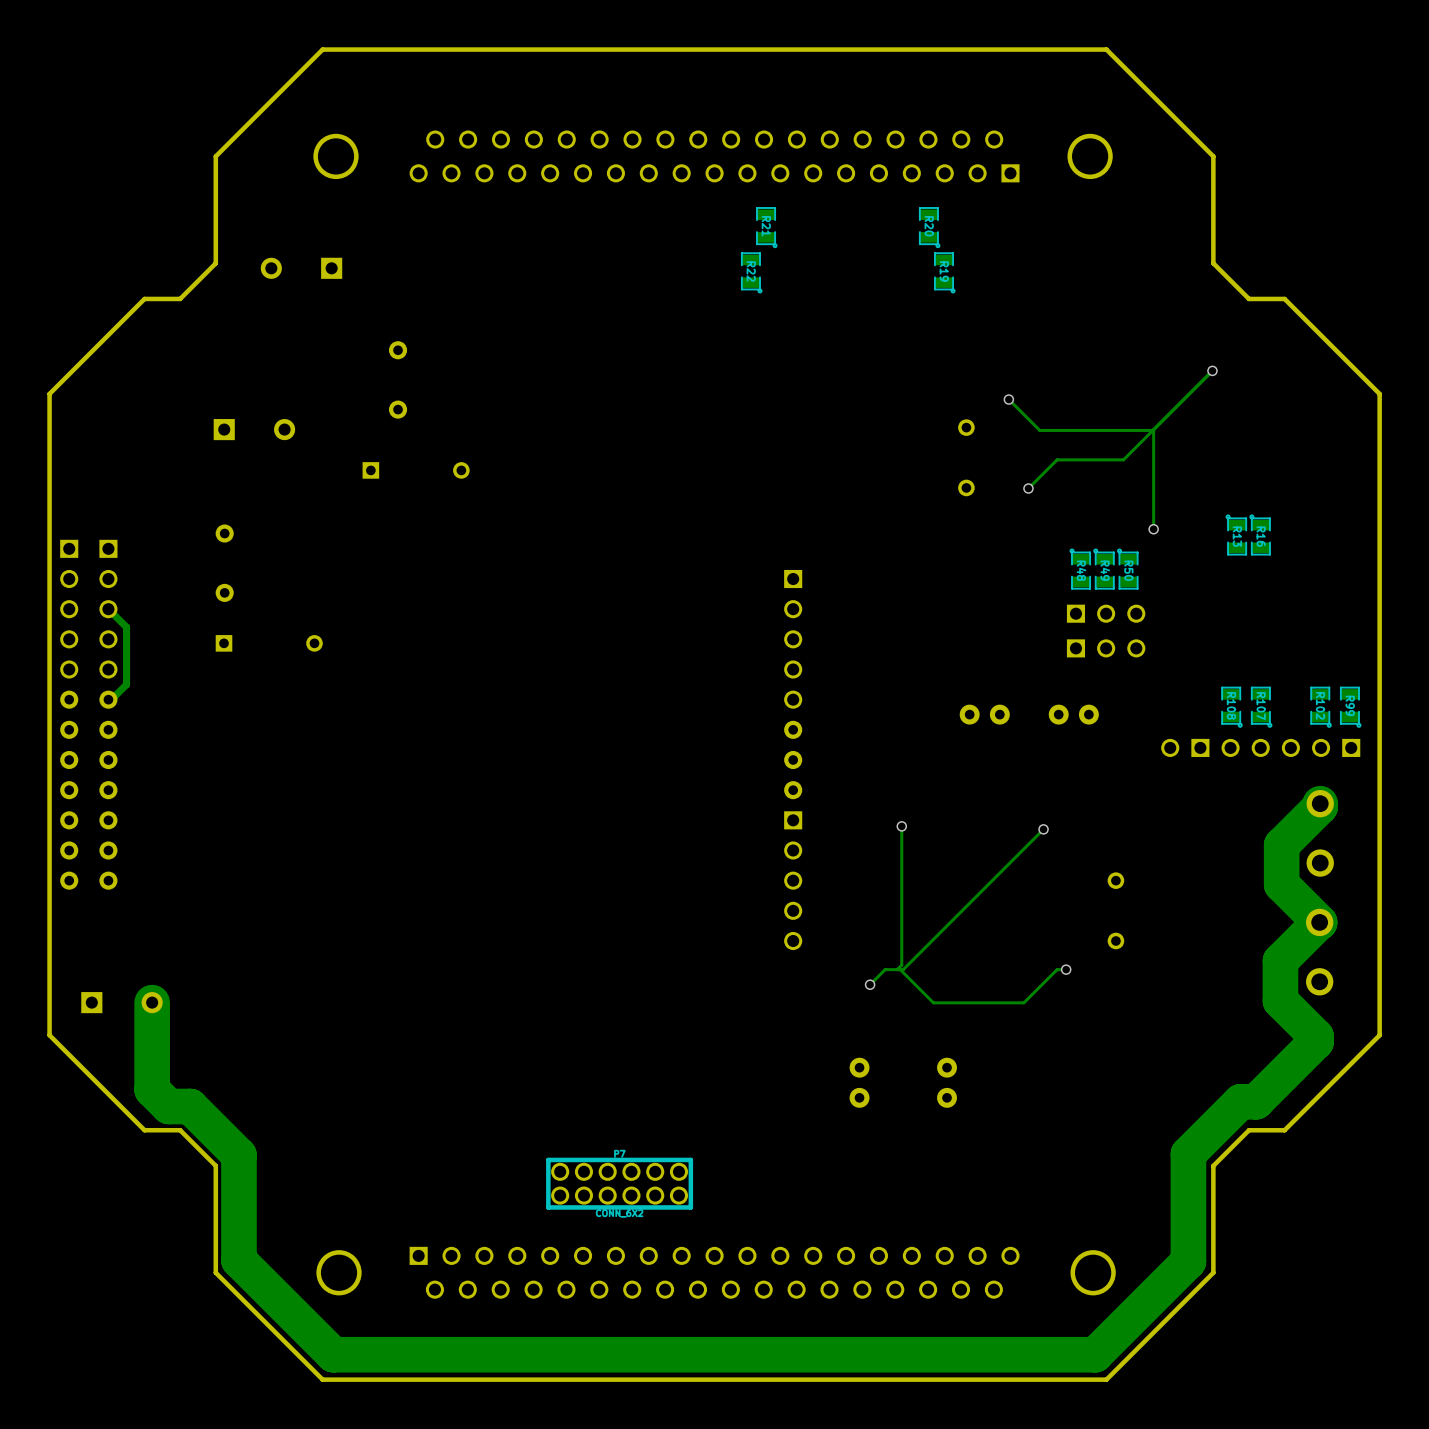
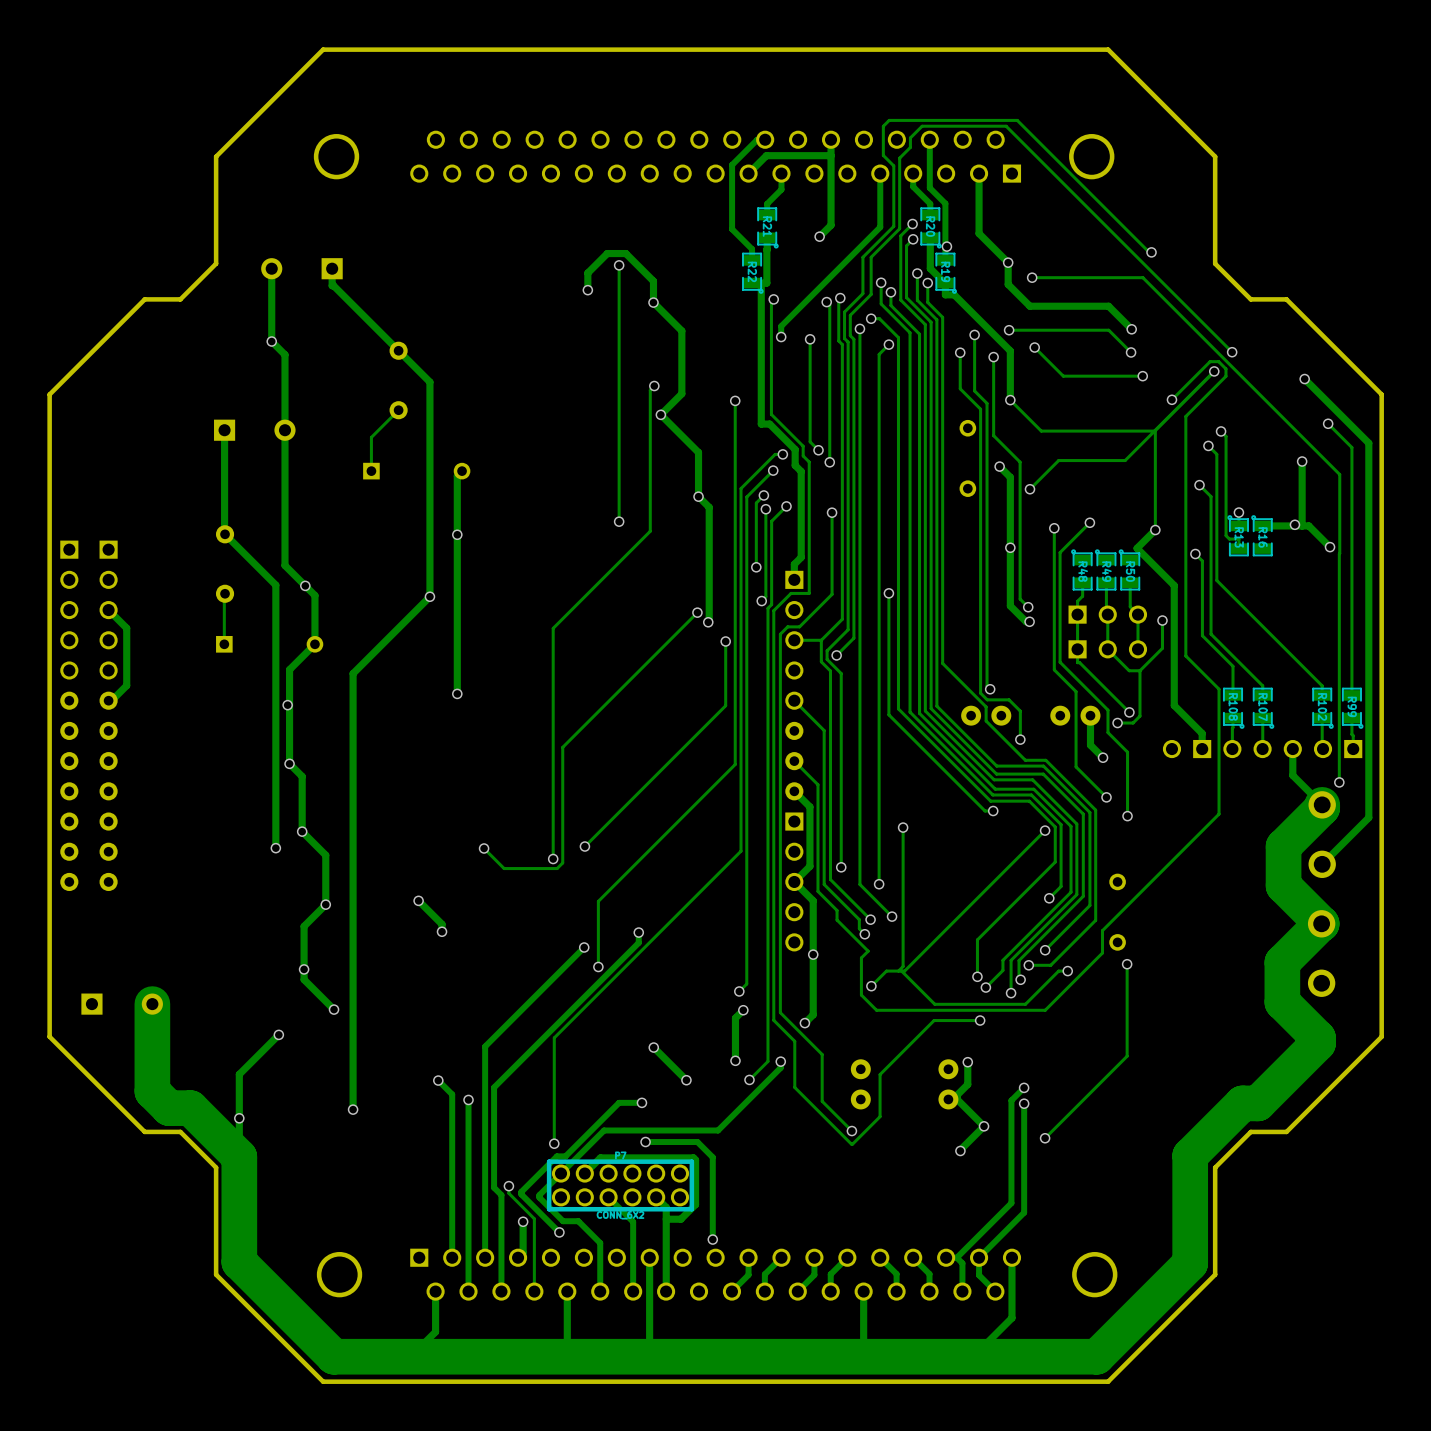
track: none -> (765, 139) (757, 139) (732, 164) (732, 229) (752, 249) (752, 260)
track: none -> (831, 139) (831, 225) (819, 236)
track: none -> (929, 139) (929, 187) (945, 203) (945, 260)
track: none -> (831, 155) (766, 155) (748, 173)
track: none -> (781, 173) (781, 189) (767, 203) (767, 215)
track: none -> (880, 173) (880, 227) (781, 326) (781, 337)
track: none -> (913, 173) (913, 186) (930, 203) (930, 215)
track: none -> (979, 173) (979, 233) (1008, 262) (1008, 284) (1029, 306) (1108, 306) (1131, 329)
track: none -> (912, 224) (900, 235) (900, 300) (925, 324) (925, 711) (994, 779) (1032, 779) (1076, 824) (1076, 894) (1011, 960) (1011, 993)
via: none -> (912, 224)
via: none -> (819, 236)
track: none -> (767, 237) (766, 283) (752, 283)
track: none -> (930, 237) (930, 268) (945, 283) (945, 294) (954, 294) (1010, 350) (1010, 400)
track: none -> (913, 239) (906, 245) (906, 297) (931, 322) (931, 708) (996, 774) (1043, 774) (1083, 814) (1083, 896) (1019, 960) (1020, 979)
via: none -> (913, 239)
via: none -> (946, 246)
track: none -> (1151, 252) (1149, 252) (1017, 120) (889, 120) (883, 126) (883, 155) (893, 165) (893, 226) (862, 257) (862, 293) (844, 312) (844, 338) (848, 342) (848, 629) (827, 650) (827, 659) (841, 673) (841, 867)
via: none -> (1151, 252)
via: none -> (1008, 262)
track: none -> (619, 265) (619, 521)
via: none -> (619, 265)
track: none -> (271, 268) (271, 341) (284, 354) (284, 565) (314, 595) (314, 644) (289, 669) (289, 763) (302, 776) (302, 831) (325, 855) (325, 904) (304, 926) (304, 979) (334, 1009)
track: none -> (332, 268) (332, 285) (429, 382) (429, 596) (353, 673) (353, 1109)
track: none -> (917, 273) (917, 300) (936, 319) (936, 706) (996, 766) (1043, 766) (1089, 812) (1089, 905) (1045, 950)
via: none -> (917, 273)
track: none -> (1032, 277) (1142, 277) (1339, 474) (1339, 782)
via: none -> (1032, 277)
track: none -> (759, 283) (761, 284) (761, 424) (769, 424) (795, 449) (795, 465) (801, 471) (801, 557) (794, 564) (794, 579)
track: none -> (881, 282) (881, 303) (910, 332) (910, 712) (992, 794) (1031, 794) (1061, 824) (1061, 886) (1049, 898)
via: none -> (881, 282)
track: none -> (927, 283) (927, 302) (942, 317) (942, 663) (986, 706) (986, 721) (1025, 760) (1045, 760) (1095, 810) (1095, 920) (1050, 965) (1028, 965)
via: none -> (927, 283)
track: none -> (587, 290) (587, 273) (607, 253) (625, 253) (653, 281) (653, 302) (681, 330) (681, 393) (660, 414) (698, 452) (698, 496) (709, 507) (708, 622)
via: none -> (587, 290)
track: none -> (890, 292) (890, 305) (919, 334) (919, 713) (995, 789) (1033, 789) (1071, 826) (1071, 892) (1002, 960) (1002, 970) (985, 987)
via: none -> (890, 292)
track: none -> (840, 298) (838, 340) (842, 344) (842, 619) (821, 640)
via: none -> (840, 298)
track: none -> (773, 299) (771, 301) (771, 414) (803, 446) (803, 455) (809, 462) (809, 593) (791, 593) (773, 610) (773, 1020) (794, 1041) (794, 1087) (851, 1144) (880, 1116) (880, 1074) (934, 1020) (980, 1020)
via: none -> (773, 299)
track: none -> (826, 302) (829, 305) (829, 462)
via: none -> (826, 302)
via: none -> (653, 302)
track: none -> (871, 318) (879, 318) (898, 337) (898, 708) (990, 801) (1029, 801) (1055, 827) (1055, 862) (977, 939) (977, 976)
via: none -> (871, 318)
track: none -> (859, 328) (859, 884) (892, 916)
via: none -> (859, 328)
via: none -> (1131, 329)
track: none -> (1009, 330) (1108, 330) (1131, 352)
via: none -> (1009, 330)
track: none -> (974, 334) (974, 391) (987, 403) (987, 686) (990, 689)
via: none -> (974, 334)
via: none -> (781, 337)
track: none -> (810, 339) (810, 441) (818, 450)
via: none -> (810, 339)
via: none -> (271, 341)
track: none -> (888, 344) (879, 354) (879, 884)
via: none -> (888, 344)
track: none -> (1034, 347) (1063, 376) (1142, 376)
via: none -> (1034, 347)
via: none -> (1131, 352)
track: none -> (1232, 352) (1006, 126) (922, 126) (910, 137) (910, 147) (899, 158) (899, 228) (871, 257) (871, 294) (850, 315) (850, 335) (853, 339) (853, 638) (836, 655)
via: none -> (1232, 352)
track: none -> (960, 352) (960, 388) (980, 409) (980, 693) (987, 699) (1009, 699) (1020, 711) (1020, 739)
via: none -> (960, 352)
track: none -> (993, 357) (993, 435) (1020, 462) (1020, 599) (1028, 607)
via: none -> (993, 357)
via: none -> (1142, 376)
track: none -> (1304, 379) (1368, 443) (1368, 817) (1322, 864)
via: none -> (1304, 379)
track: none -> (654, 386) (650, 390) (650, 531) (553, 628) (553, 859)
via: none -> (654, 386)
track: none -> (1171, 399) (1210, 361) (1218, 361) (1225, 368) (1225, 376) (1185, 416) (1185, 655) (1219, 689) (1219, 814) (1102, 930) (1102, 953) (1045, 1010) (876, 1010) (861, 995) (861, 957) (868, 951) (837, 920) (837, 910) (817, 891) (817, 784) (794, 761)
via: none -> (1171, 399)
track: none -> (735, 400) (735, 764) (598, 901) (598, 966)
via: none -> (735, 400)
track: none -> (398, 410) (371, 437) (371, 471)
via: none -> (660, 414)
track: none -> (1328, 423) (1351, 447) (1351, 695)
via: none -> (1328, 423)
track: none -> (224, 430) (224, 533) (275, 585) (275, 848)
track: none -> (1221, 431) (1226, 436) (1226, 535) (1229, 539) (1238, 539) (1238, 548)
via: none -> (1221, 431)
track: none -> (1208, 445) (1216, 454) (1216, 580) (1322, 685) (1322, 695)
via: none -> (1208, 445)
via: none -> (818, 450)
track: none -> (782, 454) (775, 454) (741, 488) (741, 851) (554, 1037) (554, 1143)
via: none -> (782, 454)
track: none -> (1302, 461) (1302, 525)
via: none -> (1302, 461)
via: none -> (829, 462)
track: none -> (999, 466) (1010, 477) (1010, 606) (1026, 621) (1029, 621)
via: none -> (999, 466)
track: none -> (773, 470) (746, 497) (746, 984) (739, 991)
via: none -> (773, 470)
track: none -> (462, 471) (457, 475) (457, 693)
track: none -> (1199, 485) (1211, 496) (1211, 634) (1262, 685) (1262, 695)
via: none -> (1199, 485)
track: none -> (763, 495) (756, 503) (756, 567)
via: none -> (763, 495)
via: none -> (698, 496)
track: none -> (786, 506) (771, 521) (771, 604) (767, 608) (767, 1061) (749, 1079)
via: none -> (786, 506)
track: none -> (765, 509) (765, 596) (761, 601)
via: none -> (765, 509)
track: none -> (832, 512) (832, 594) (799, 626) (787, 626) (780, 634) (780, 1012) (822, 1054) (822, 1101) (851, 1131)
via: none -> (832, 512)
via: none -> (1238, 512)
via: none -> (619, 521)
track: none -> (1089, 522) (1060, 552) (1060, 662) (1107, 710) (1107, 732) (1127, 752) (1127, 816)
via: none -> (1089, 522)
via: none -> (1294, 524)
track: none -> (1262, 525) (1308, 525) (1330, 547)
track: none -> (1054, 528) (1054, 669) (1076, 691) (1076, 766) (1106, 797)
via: none -> (1054, 528)
track: none -> (1155, 530) (1137, 548) (1174, 585) (1174, 705) (1202, 733) (1202, 749)
via: none -> (457, 534)
via: none -> (1010, 547)
via: none -> (1330, 547)
track: none -> (1195, 554) (1202, 561) (1202, 635) (1232, 666) (1232, 695)
via: none -> (1195, 554)
via: none -> (756, 567)
track: none -> (1082, 582) (1082, 596) (1077, 601) (1077, 662) (1129, 712)
track: none -> (1106, 582) (1107, 649) (1129, 670) (1139, 670)
track: none -> (1130, 582) (1130, 606) (1137, 614) (1137, 649)
via: none -> (305, 585)
track: none -> (225, 593) (224, 644)
track: none -> (888, 593) (888, 714) (985, 811) (993, 811)
via: none -> (888, 593)
via: none -> (429, 596)
via: none -> (761, 601)
via: none -> (1028, 607)
track: none -> (697, 612) (562, 747) (562, 862) (557, 868) (504, 868) (484, 848)
via: none -> (697, 612)
track: none -> (1162, 620) (1162, 648) (1139, 670)
via: none -> (1162, 620)
via: none -> (1029, 621)
via: none -> (708, 622)
track: none -> (821, 640) (821, 661) (830, 670) (830, 879) (870, 919)
track: none -> (821, 640) (794, 640)
track: none -> (725, 641) (725, 705) (584, 846)
via: none -> (725, 641)
via: none -> (836, 655)
track: none -> (1139, 670) (1139, 716) (1133, 723) (1117, 723)
via: none -> (990, 689)
via: none -> (457, 693)
track: none -> (794, 700) (824, 730) (824, 884) (859, 919) (859, 928) (864, 934)
via: none -> (287, 705)
via: none -> (1129, 712)
track: none -> (1090, 715) (1090, 745) (1103, 757)
track: none -> (1232, 718) (1232, 749)
track: none -> (1262, 718) (1262, 748)
track: none -> (1322, 718) (1323, 749)
track: none -> (1351, 718) (1353, 749)
via: none -> (1117, 723)
via: none -> (1020, 739)
track: none -> (1292, 749) (1292, 775) (1322, 804)
via: none -> (1103, 757)
via: none -> (289, 763)
via: none -> (1339, 782)
track: none -> (794, 791) (809, 806) (809, 866) (794, 881) (813, 900) (813, 1014) (804, 1023)
via: none -> (1106, 797)
via: none -> (993, 811)
via: none -> (1127, 816)
via: none -> (302, 831)
via: none -> (584, 846)
via: none -> (275, 848)
via: none -> (484, 848)
via: none -> (553, 859)
via: none -> (841, 867)
via: none -> (879, 884)
via: none -> (1049, 898)
track: none -> (418, 900) (442, 924) (442, 931)
via: none -> (418, 900)
via: none -> (325, 904)
via: none -> (892, 916)
via: none -> (870, 919)
via: none -> (442, 931)
track: none -> (638, 932) (638, 942) (494, 1087) (494, 1187) (501, 1195) (501, 1291)
via: none -> (638, 932)
via: none -> (864, 934)
track: none -> (584, 947) (485, 1046) (485, 1257)
via: none -> (584, 947)
via: none -> (1045, 950)
via: none -> (813, 954)
track: none -> (1127, 964) (1127, 1056) (1045, 1138)
via: none -> (1127, 964)
via: none -> (1028, 965)
via: none -> (598, 966)
via: none -> (304, 969)
via: none -> (977, 976)
via: none -> (1020, 979)
via: none -> (985, 987)
via: none -> (739, 991)
via: none -> (1011, 993)
via: none -> (334, 1009)
track: none -> (743, 1010) (735, 1018) (735, 1060)
via: none -> (743, 1010)
via: none -> (980, 1020)
via: none -> (804, 1023)
track: none -> (278, 1034) (239, 1074) (239, 1156)
via: none -> (278, 1034)
track: none -> (653, 1047) (686, 1080)
via: none -> (653, 1047)
via: none -> (735, 1060)
track: none -> (780, 1061) (780, 1067) (718, 1130) (604, 1130) (539, 1195) (539, 1197) (563, 1221) (578, 1221) (600, 1243) (600, 1291)
via: none -> (780, 1061)
track: none -> (967, 1062) (967, 1084) (957, 1095) (957, 1099)
via: none -> (967, 1062)
track: none -> (438, 1080) (452, 1094) (452, 1257)
via: none -> (438, 1080)
via: none -> (686, 1080)
via: none -> (749, 1079)
track: none -> (1024, 1087) (1011, 1100) (1011, 1203) (956, 1257)
via: none -> (1024, 1087)
track: none -> (957, 1099) (984, 1126) (960, 1150)
track: none -> (468, 1099) (468, 1291)
via: none -> (468, 1099)
track: none -> (641, 1102) (619, 1102) (565, 1156) (556, 1156) (521, 1191) (521, 1194) (559, 1232)
via: none -> (641, 1102)
track: none -> (1024, 1103) (1024, 1212) (979, 1257) (979, 1275) (995, 1291)
via: none -> (1024, 1103)
via: none -> (353, 1109)
via: none -> (239, 1118)
via: none -> (984, 1126)
via: none -> (851, 1131)
via: none -> (1045, 1138)
track: none -> (645, 1142) (697, 1142) (712, 1157) (712, 1239)
via: none -> (645, 1142)
via: none -> (554, 1143)
via: none -> (960, 1150)
track: none -> (584, 1173) (600, 1157) (693, 1157) (695, 1159) (695, 1204) (680, 1219) (666, 1219)
track: none -> (508, 1186) (508, 1193) (534, 1218) (534, 1291)
via: none -> (508, 1186)
track: none -> (608, 1197) (633, 1221) (633, 1291)
track: none -> (656, 1197) (666, 1207) (666, 1291)
track: none -> (523, 1221) (523, 1252) (518, 1257)
via: none -> (523, 1221)
via: none -> (559, 1232)
via: none -> (712, 1239)
track: none -> (748, 1257) (748, 1274) (731, 1291)
track: none -> (781, 1257) (764, 1274) (764, 1291)
track: none -> (814, 1257) (814, 1274) (797, 1291)
track: none -> (847, 1257) (830, 1274) (830, 1291)
track: none -> (880, 1257) (896, 1274) (896, 1291)
track: none -> (913, 1257) (929, 1274) (929, 1291)
track: none -> (956, 1257) (962, 1263) (962, 1291)
track: none -> (1011, 1257) (1011, 1318) (973, 1356)
track: none -> (649, 1257) (649, 1356)
track: none -> (435, 1291) (435, 1331) (410, 1356)
track: none -> (567, 1291) (567, 1356)
track: none -> (863, 1291) (863, 1356)

